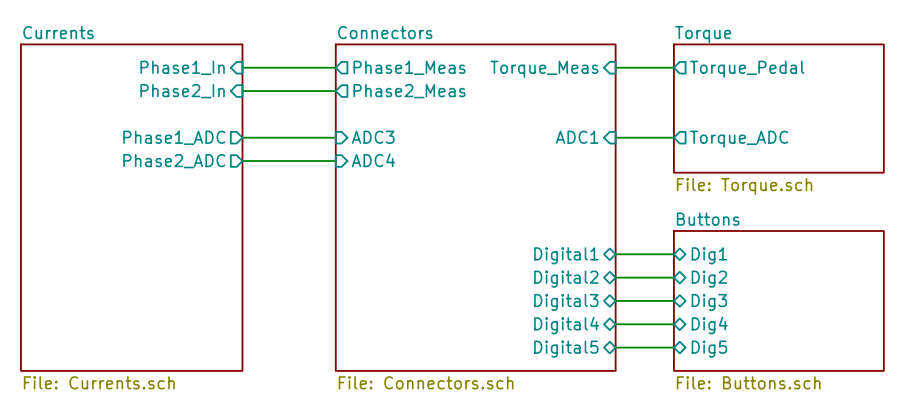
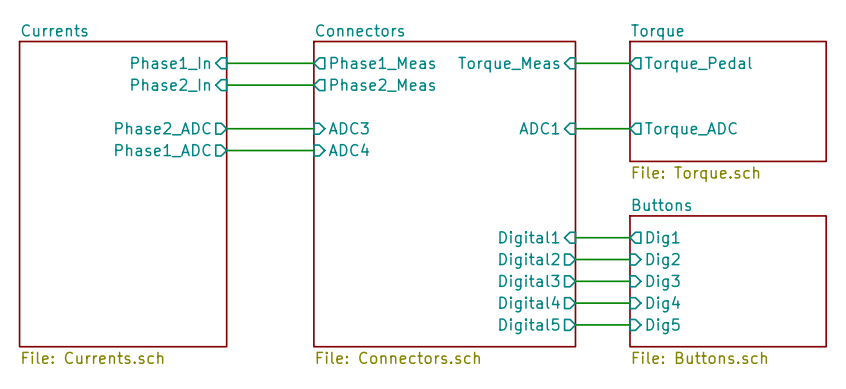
sheet pin: Phase1_ADC (174, 137) -> Phase2_ADC (162, 128)
sheet pin: Phase2_ADC (174, 161) -> Phase1_ADC (162, 150)
sheet pin shape: bidirectional (566, 255) -> input (529, 239)
sheet pin shape: bidirectional (709, 255) -> output (663, 239)
sheet pin shape: bidirectional (566, 279) -> output (529, 260)
sheet pin shape: bidirectional (709, 279) -> input (663, 260)
sheet pin shape: bidirectional (566, 302) -> output (529, 282)
sheet pin shape: bidirectional (709, 302) -> input (663, 282)
sheet pin shape: bidirectional (566, 325) -> output (529, 304)
sheet pin shape: bidirectional (709, 325) -> input (663, 304)
sheet pin shape: bidirectional (566, 349) -> output (529, 326)
sheet pin shape: bidirectional (709, 349) -> input (663, 326)

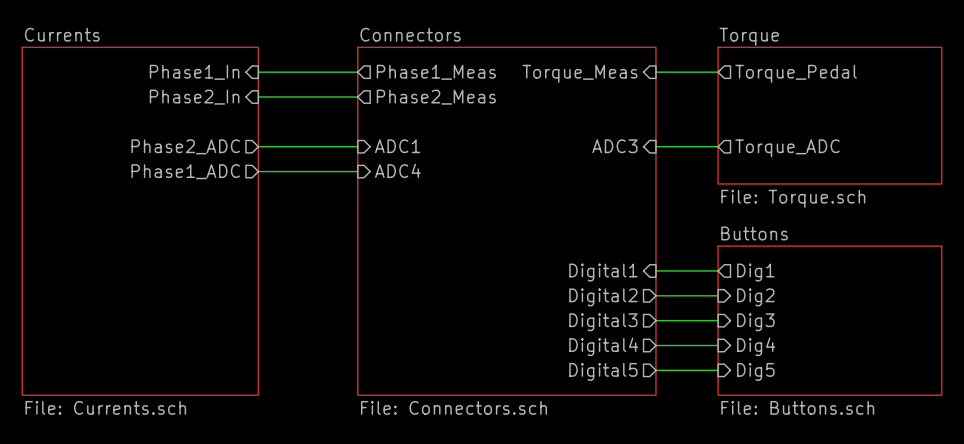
sheet pin: ADC3 (348, 128) -> ADC1 (397, 146)
sheet pin: ADC1 (539, 128) -> ADC3 (614, 146)

